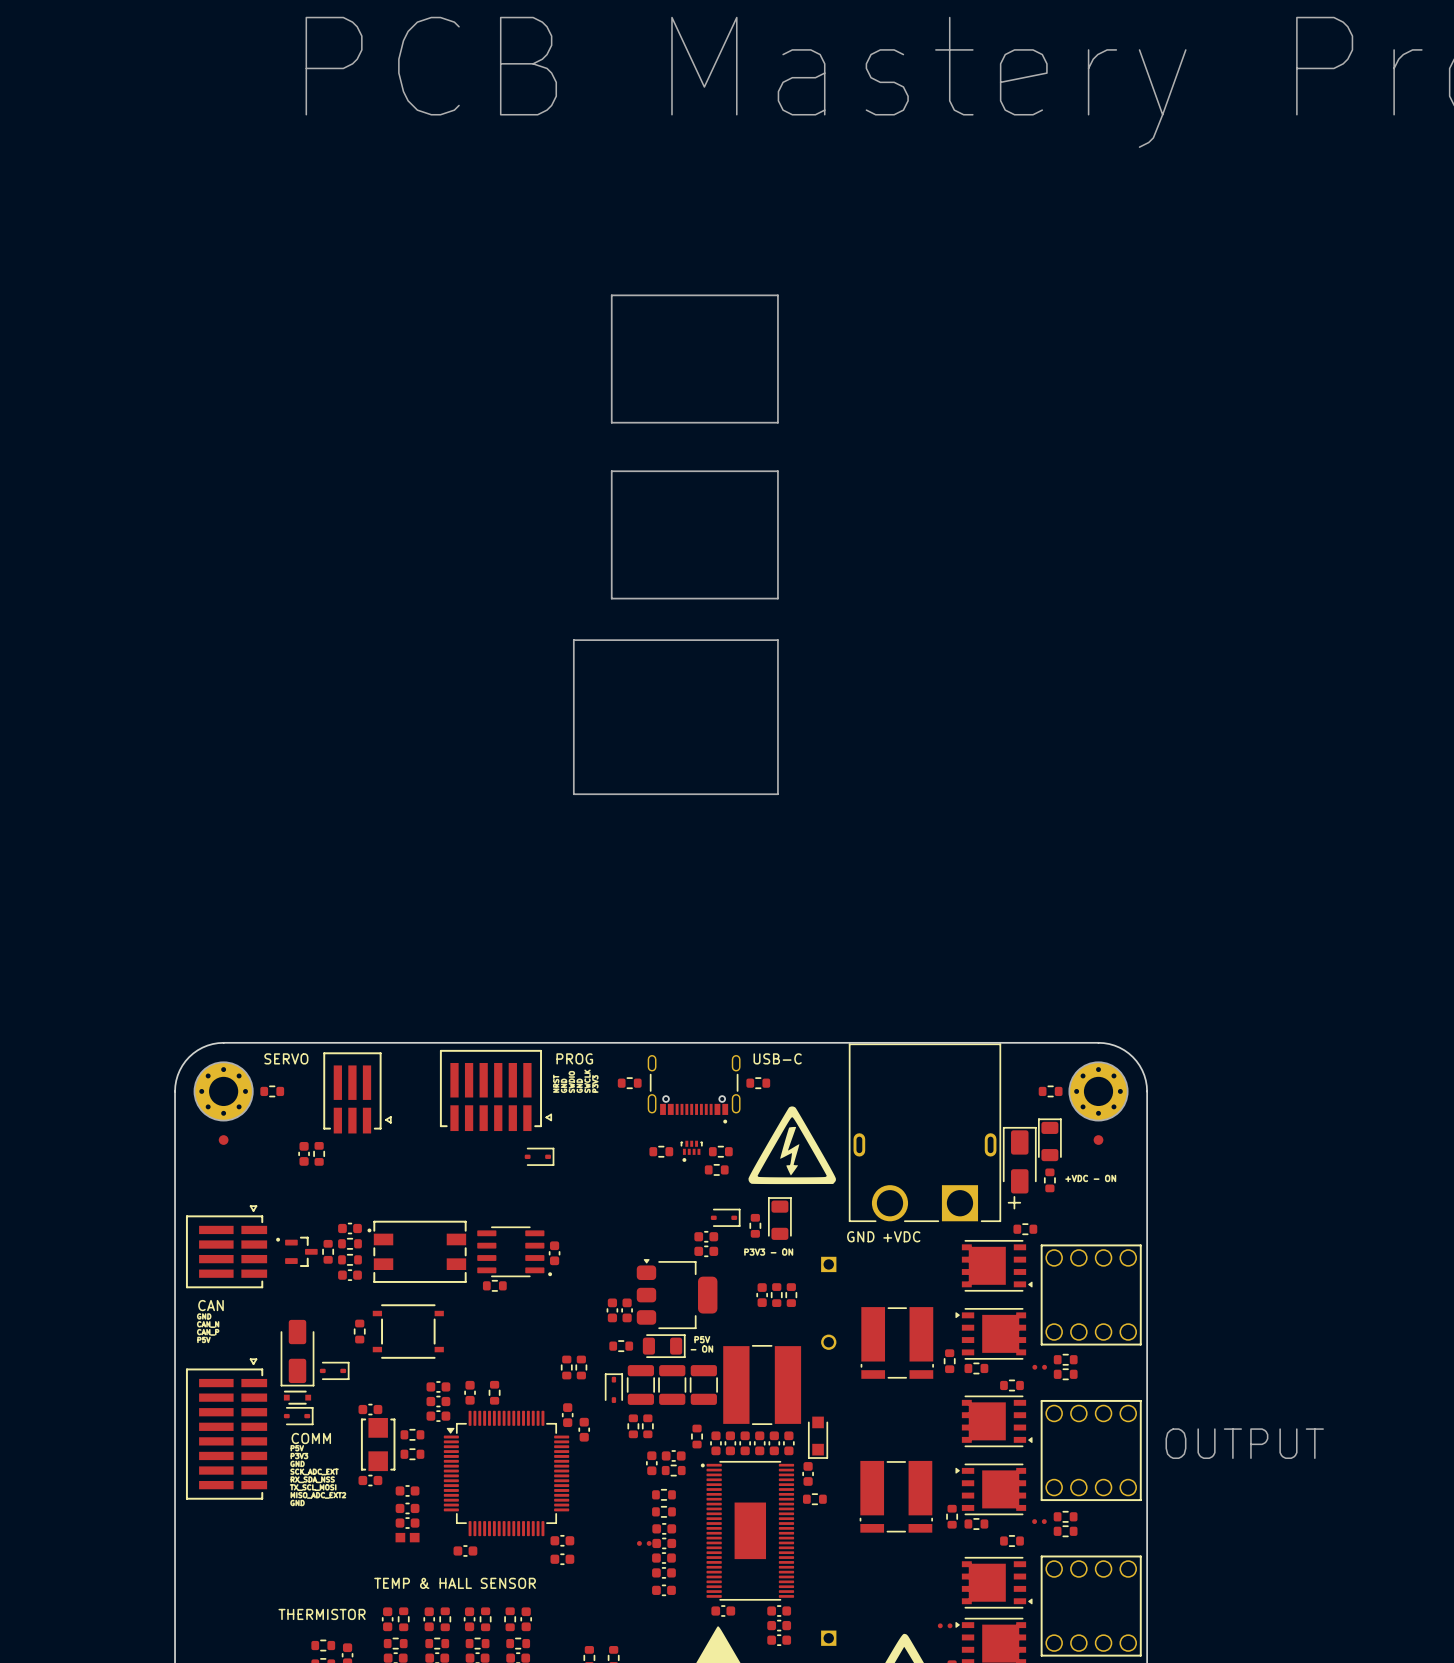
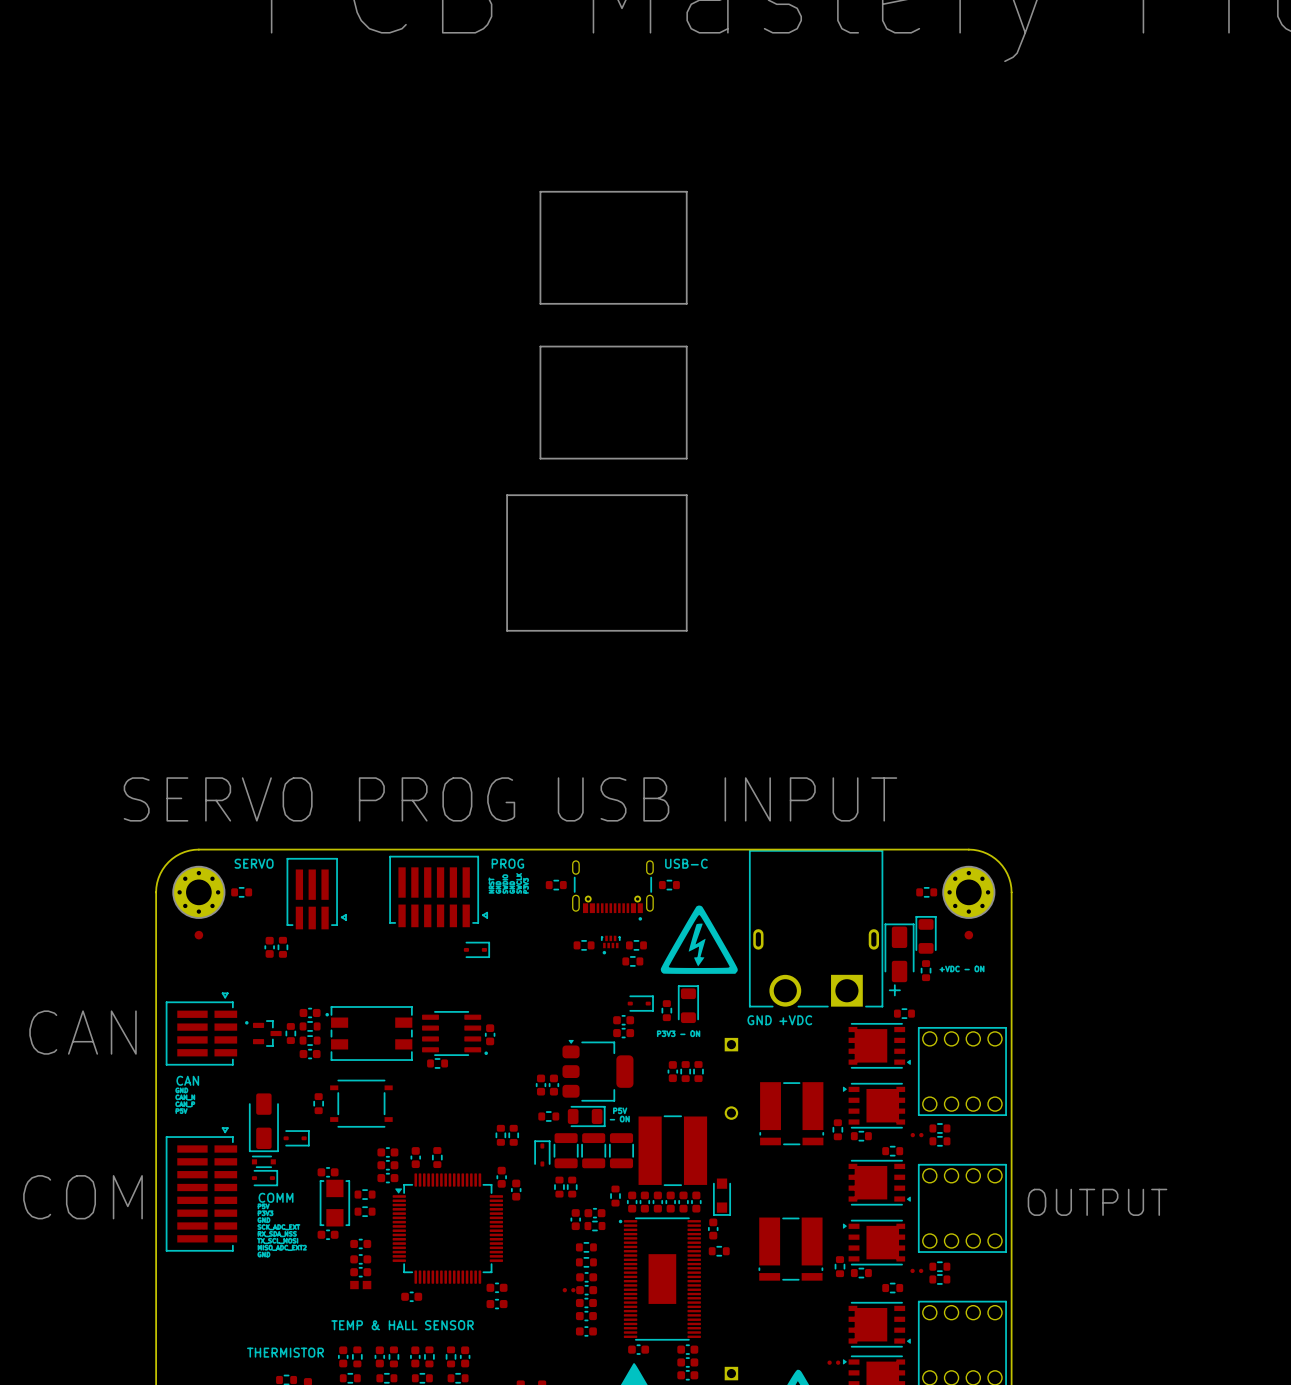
text: none -> SERVO (218, 799)
text: none -> PROG (437, 799)
text: none -> USB (613, 799)
text: none -> INPUT (810, 799)
text: none -> CAN (83, 1032)
text: none -> COM (83, 1197)

